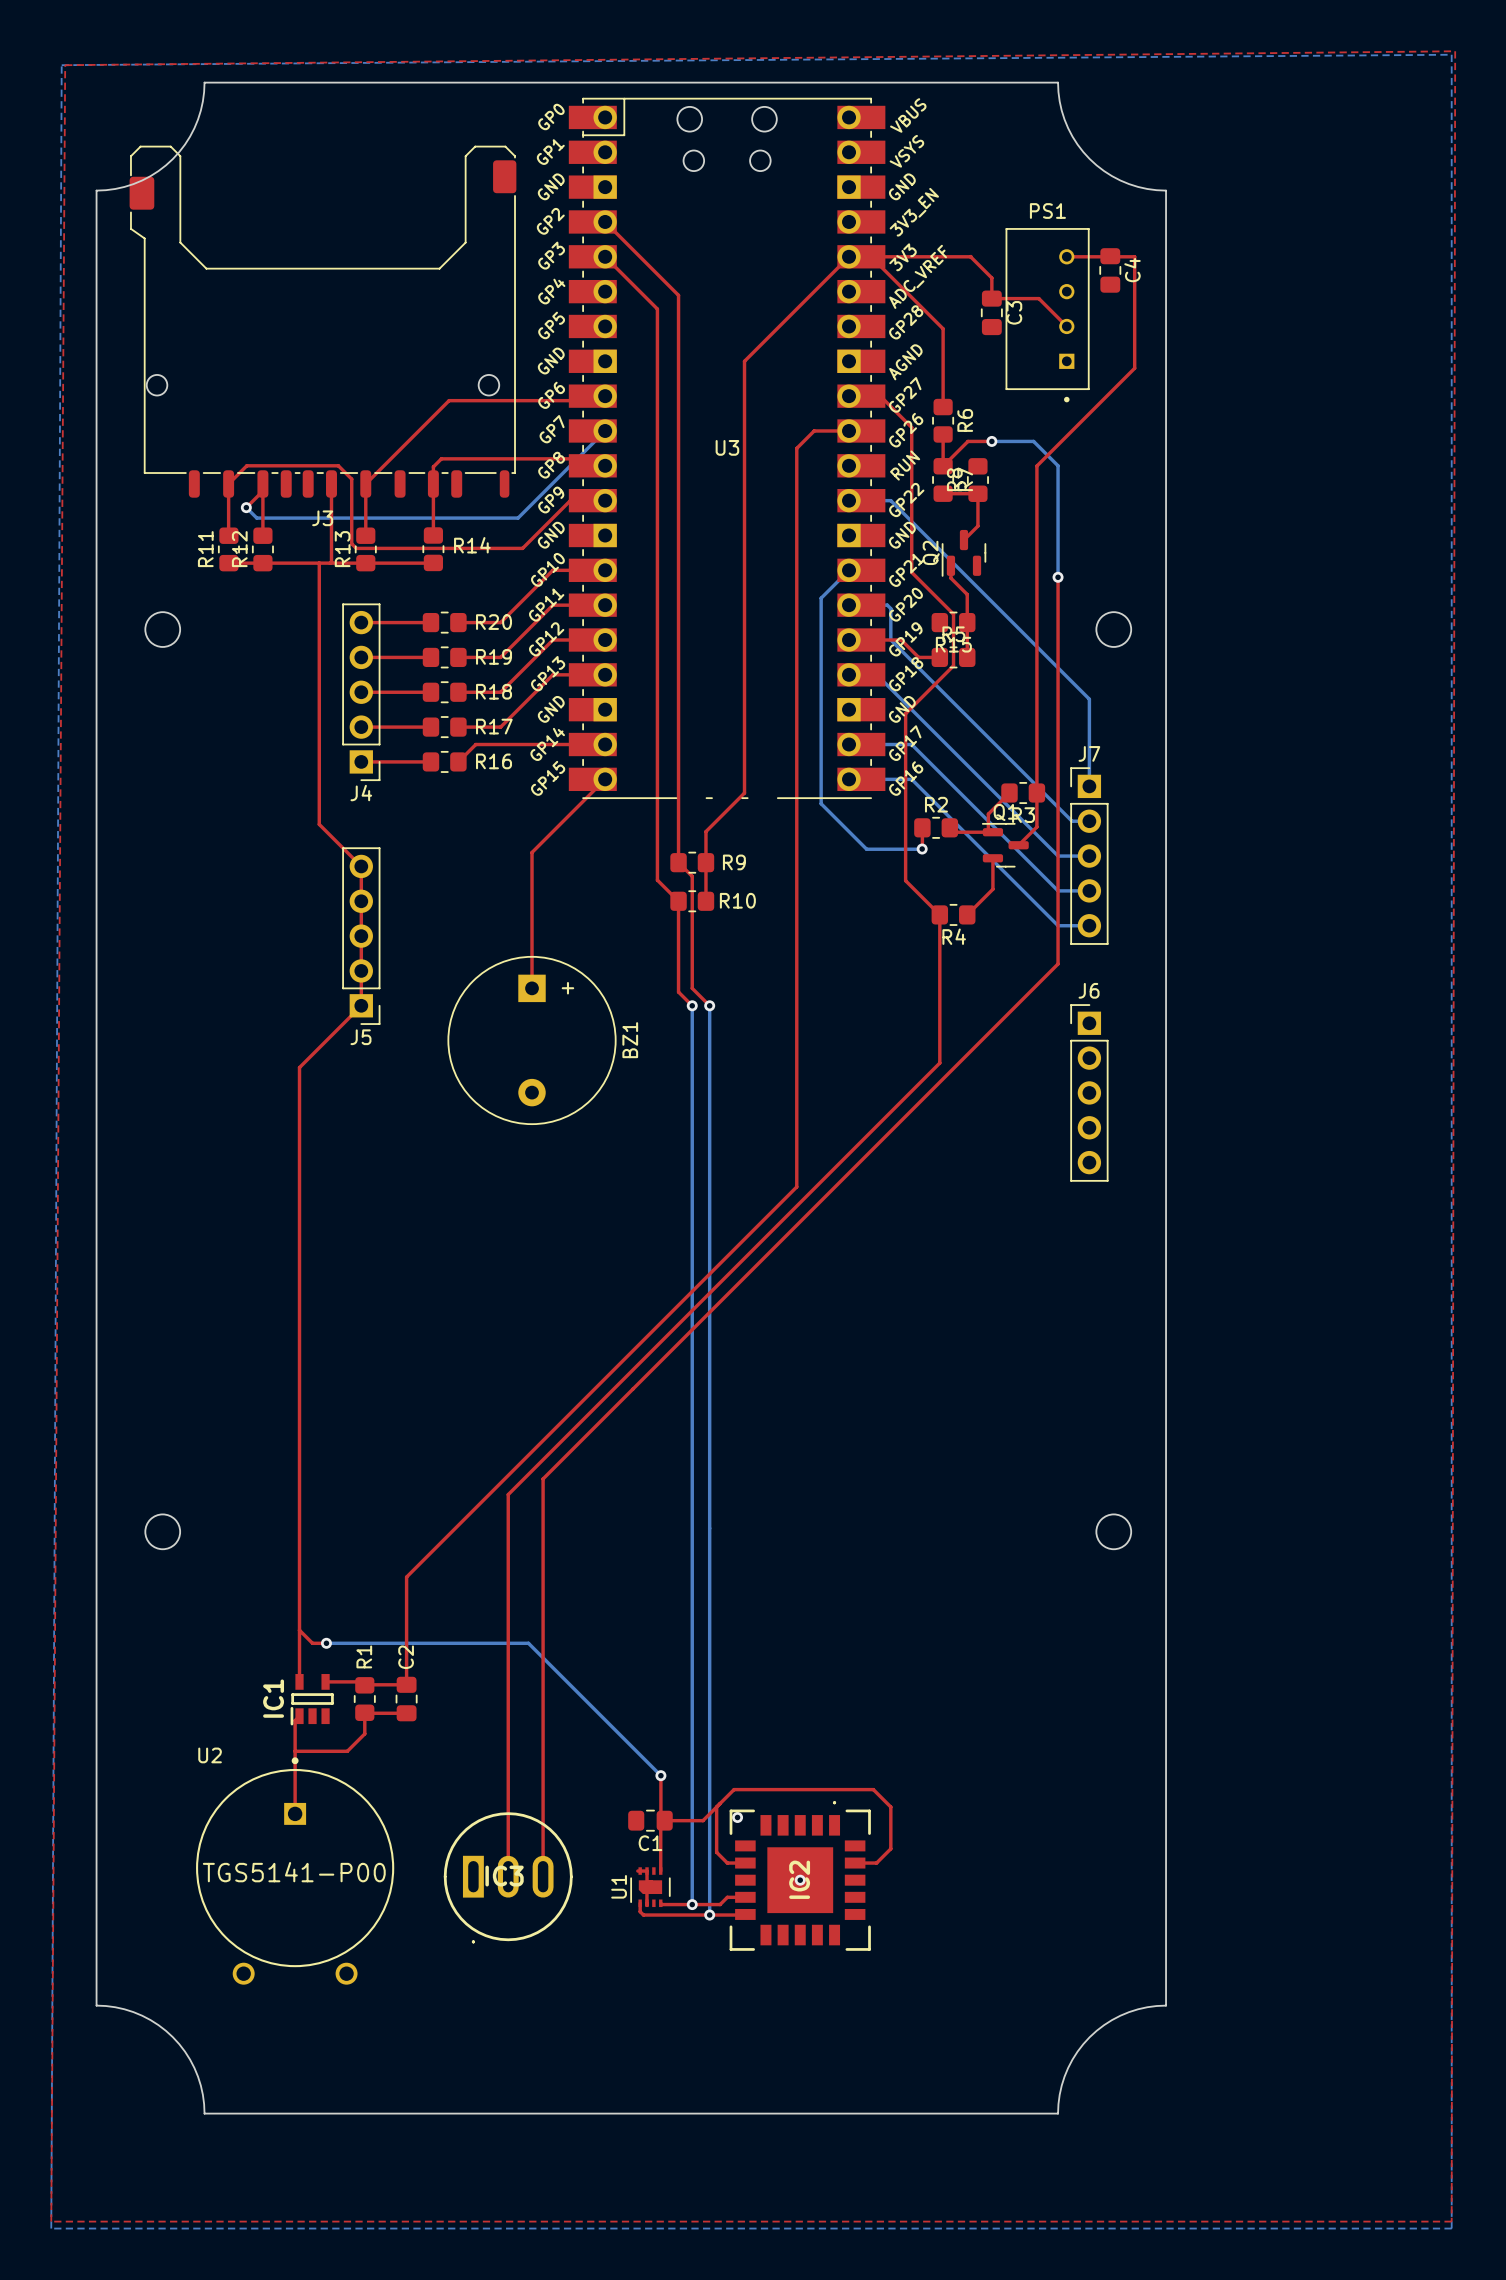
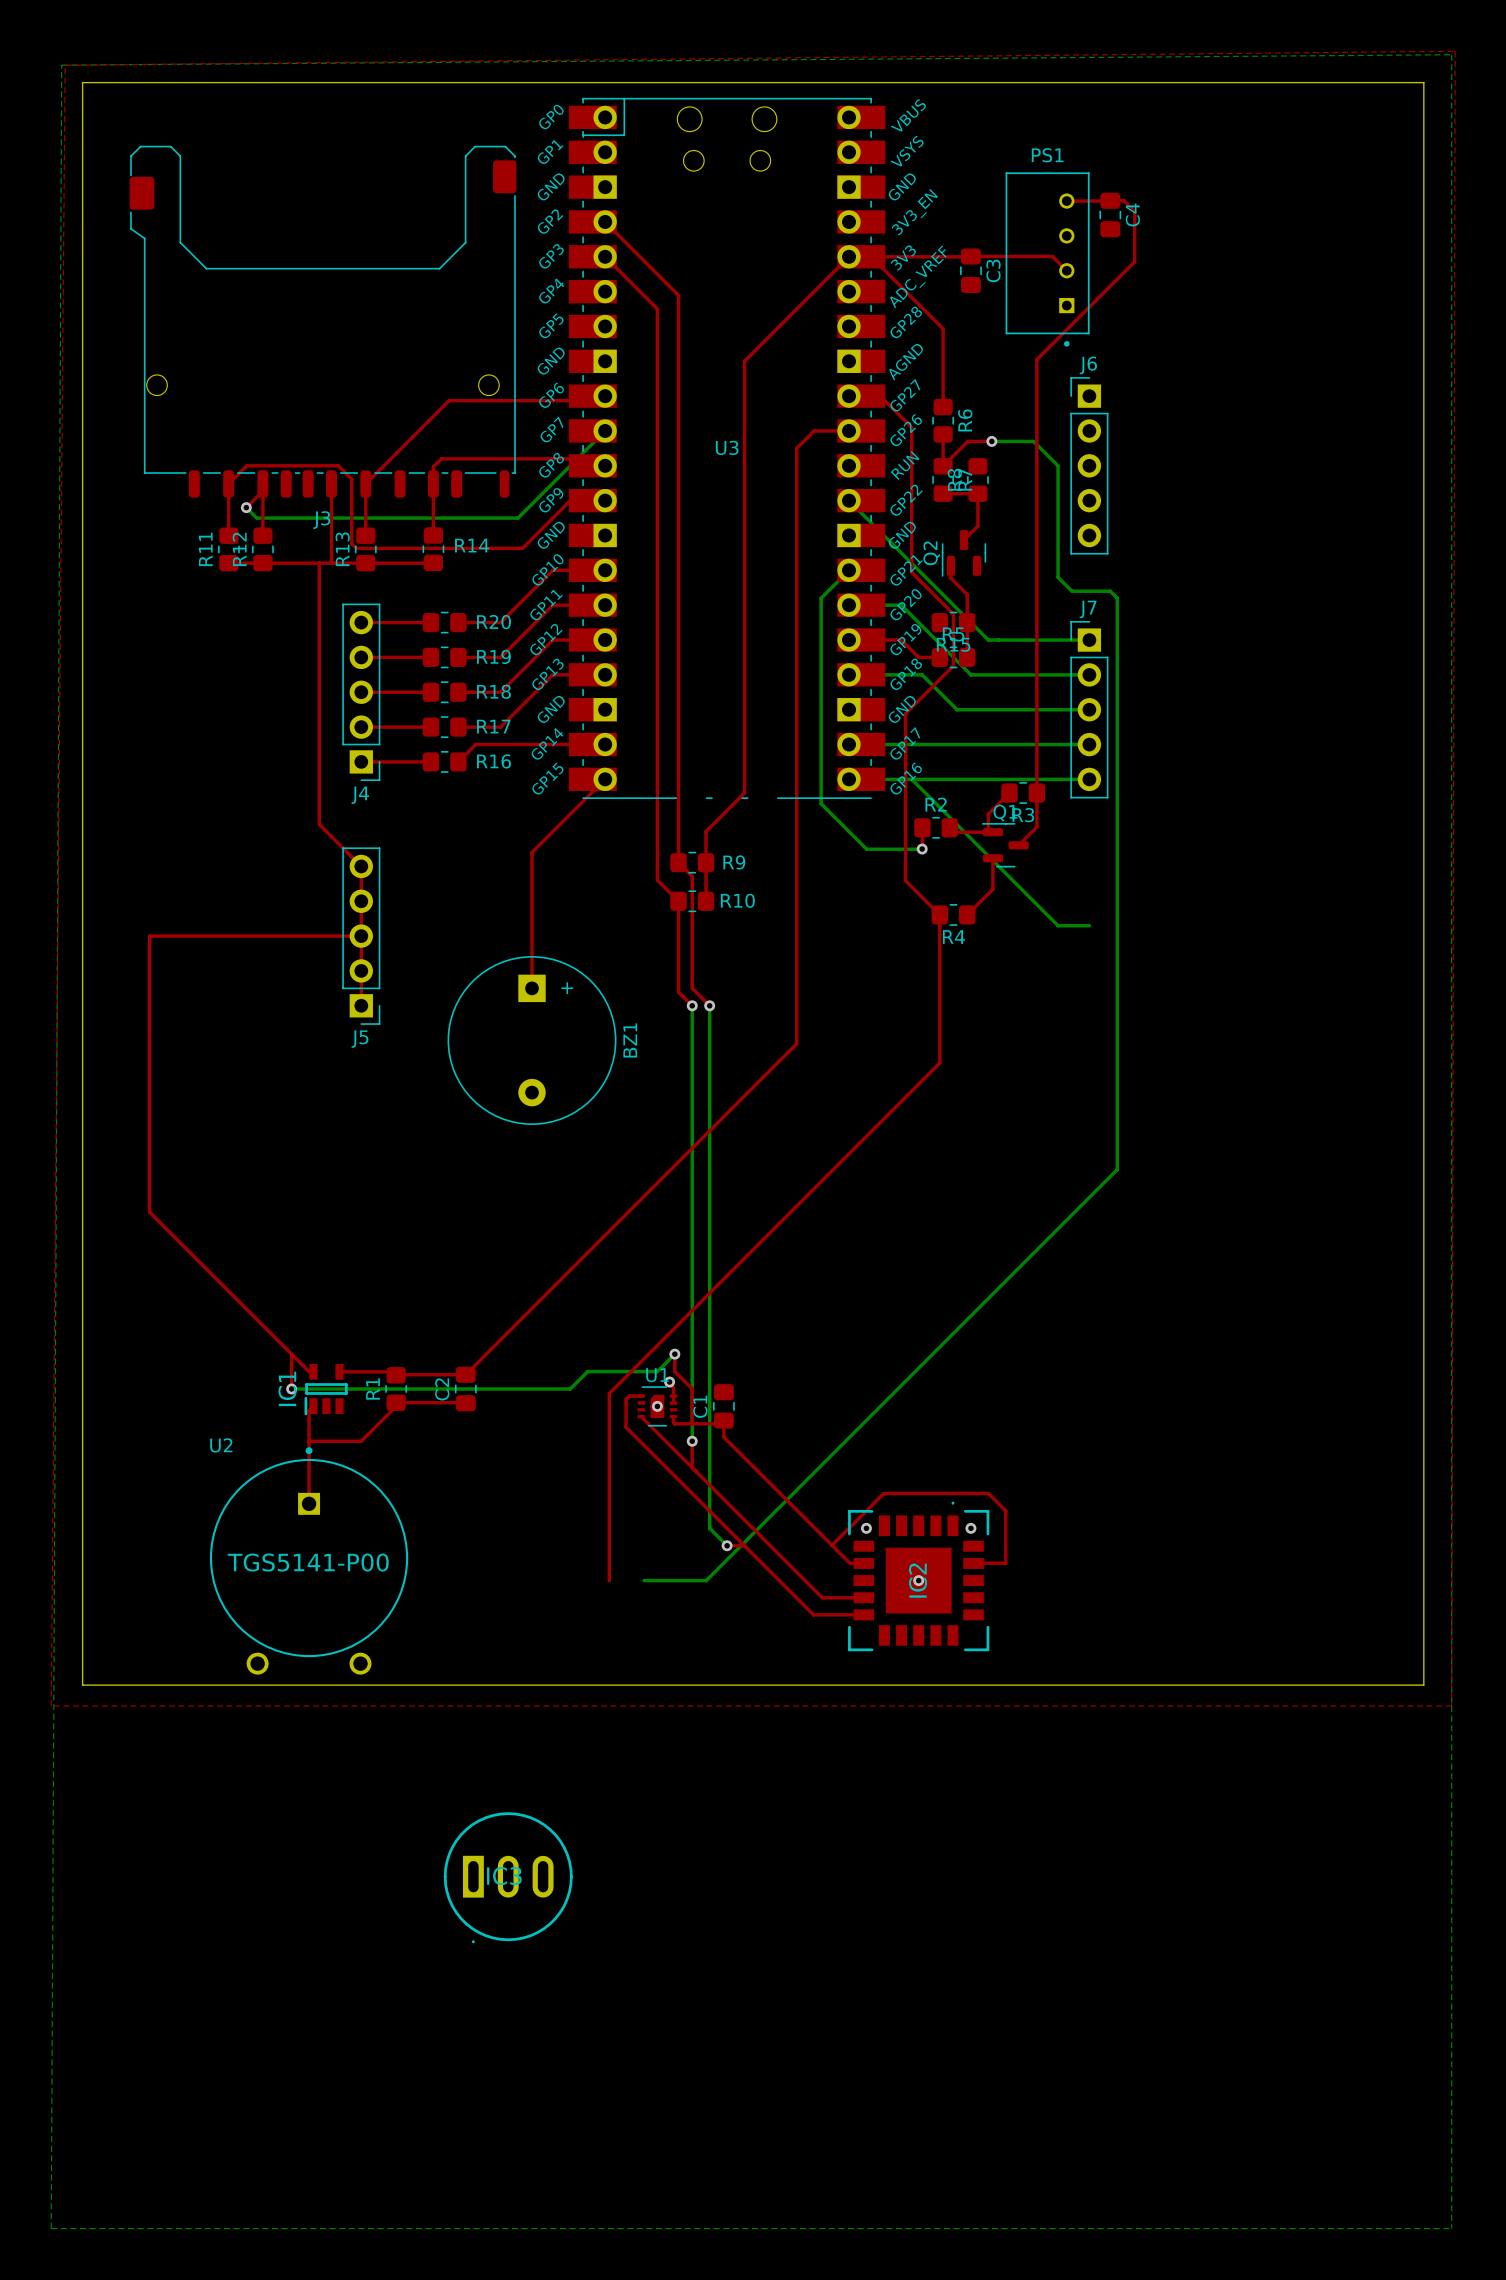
top zone outline: (1455, 51) (1451, 2221) (51, 2221) (65, 65) -> (1455, 51) (1451, 1706) (51, 1706) (65, 65)
board edge: (204, 82) (202, 101) (194, 128) (185, 144) (172, 158) (158, 171) (142, 180) (124, 186) (96, 190) (96, 2005) (115, 2007) (142, 2015) (158, 2025) (172, 2037) (185, 2051) (198, 2076) (202, 2094) (204, 2113) (1058, 2113) (1059, 2094) (1064, 2076) (1077, 2051) (1089, 2037) (1104, 2025) (1120, 2015) (1138, 2009) (1166, 2005) (1166, 190) (1147, 188) (1129, 184) (1104, 171) (1089, 158) (1072, 136) (1064, 119) (1059, 101) (1058, 82) -> (204, 82) (82, 82) (82, 1685) (1423, 1685) (1423, 82) (1058, 82)
top track: (970, 256) (991, 278) (991, 298) (1038, 298) (1066, 326) -> (970, 256) (1052, 256) (1066, 270)
top track: (1066, 256) (1134, 256) -> (1066, 201) (1123, 200) (1134, 211) (1134, 256)
top track: (1134, 261) (1134, 368) (1036, 466) -> (1134, 261) (1036, 359) (1036, 466)
C4 position: (1110, 270) -> (1110, 214)
C3 position: (991, 312) -> (970, 270)
PS1 position: (1047, 315) -> (1047, 259)
bottom track: (849, 500) (890, 500) (1089, 699) (1089, 786) -> (849, 500) (988, 640) (1089, 640)
top track: (1058, 577) (1058, 963) (543, 1478) (543, 1876) -> none
bottom track: none -> (1058, 577) (1071, 591) (1110, 591) (1117, 598) (1117, 1169) (706, 1580) (644, 1580)
via: (1058, 577) -> none
bottom track: (887, 605) (890, 608) (890, 640) (1072, 821) (1089, 821) -> (887, 605) (901, 605) (971, 674) (1089, 674)
round board edge: [144, 611, 181, 648] -> none
round board edge: [1095, 611, 1132, 648] -> none
bottom track: (876, 674) (1058, 856) (1089, 856) -> (876, 674) (922, 674) (957, 709) (1089, 709)
bottom track: (849, 744) (911, 744) (1058, 890) (1089, 890) -> (849, 744) (1089, 744)
J7 position: (1089, 856) -> (1089, 709)
top track: none -> (361, 936) (149, 936) (149, 1212) (309, 1371) (313, 1371)
top track: (361, 1005) (299, 1067) (299, 1681) -> none
top track: (796, 1043) (796, 1186) (406, 1577) (406, 1684) (364, 1685) (361, 1681) (325, 1681) -> (796, 1043) (465, 1374) (396, 1375) (392, 1371) (339, 1371)
J6 position: (1089, 1092) -> (1089, 465)
top track: none -> (291, 1354) (291, 1388)
top track: none -> (674, 1354) (674, 1371) (692, 1388) (692, 1423)
bottom track: none -> (674, 1354) (657, 1371) (587, 1371) (570, 1388) (291, 1388)
via: none -> (674, 1354)
via: none -> (669, 1382)
top track: none -> (670, 1383) (669, 1382) (673, 1387) (673, 1402)
via: none -> (291, 1388)
top track: (609, 1393) (508, 1494) (508, 1876) -> (609, 1393) (609, 1580)
top track: none -> (641, 1396) (629, 1396) (626, 1399) (626, 1427) (813, 1614) (863, 1614)
top track: none -> (465, 1403) (396, 1402) (396, 1406) (361, 1441) (309, 1441)
via: none -> (657, 1406)
top track: none -> (641, 1416) (822, 1597) (863, 1597)
top track: none -> (673, 1416) (674, 1423) (720, 1423) (723, 1420) (723, 1437) (850, 1563) (863, 1563)
top track: none -> (692, 1441) (692, 1467)
bottom track: (692, 1441) (692, 1904) -> none
via: none -> (692, 1441)
round board edge: [144, 1513, 181, 1550] -> none
round board edge: [1095, 1513, 1132, 1550] -> none
bottom track: (709, 1528) (709, 1915) -> (709, 1528) (727, 1545)
via: none -> (866, 1528)
via: none -> (970, 1528)
top track: none -> (727, 1545) (744, 1545)
via: none -> (727, 1545)
top track: none -> (832, 1545) (883, 1493) (988, 1493) (1005, 1510) (1005, 1563) (973, 1563)
via: none -> (918, 1580)
top track: (299, 1630) (312, 1643) (326, 1643) -> none
bottom track: (326, 1643) (528, 1643) (660, 1775) -> none
via: (326, 1643) -> none
R1 name position: R1 (364, 1656) -> R1 (373, 1388)
C2 name position: C2 (406, 1657) -> C2 (442, 1389)
IC1 position: (312, 1699) -> (326, 1389)
R1 position: (364, 1699) -> (396, 1388)
C2 position: (406, 1699) -> (465, 1388)
top track: (406, 1713) (364, 1712) (364, 1733) (347, 1751) (295, 1751) -> none
top track: (299, 1716) (295, 1720) (295, 1813) -> (313, 1406) (309, 1410) (309, 1503)
top track: (660, 1775) (660, 1816) (664, 1820) -> none
via: (660, 1775) -> none
top track: (716, 1807) (716, 1852) (727, 1863) (745, 1863) -> none
via: (737, 1817) -> none
C1 rotation: 0° (650, 1820) -> 90° clockwise (723, 1406)
C1 position: (650, 1820) -> (723, 1406)
top track: (664, 1820) (703, 1820) (734, 1789) (873, 1789) (890, 1807) (890, 1848) (876, 1863) (855, 1863) -> none
top track: (664, 1820) (660, 1824) (660, 1871) -> none
U2 position: (295, 1870) -> (309, 1560)
top track: (637, 1871) (647, 1871) (647, 1883) (650, 1887) (646, 1890) (646, 1904) -> none
IC2 position: (800, 1876) -> (918, 1576)
via: (800, 1880) -> none
U1 rotation: 0° (650, 1887) -> 90° clockwise (657, 1406)
U1 position: (650, 1887) -> (657, 1406)
top track: (745, 1897) (727, 1897) (720, 1904) (660, 1903) -> none
top track: (640, 1903) (640, 1911) (643, 1915) (745, 1914) -> none
via: (692, 1904) -> none
via: (709, 1915) -> none

